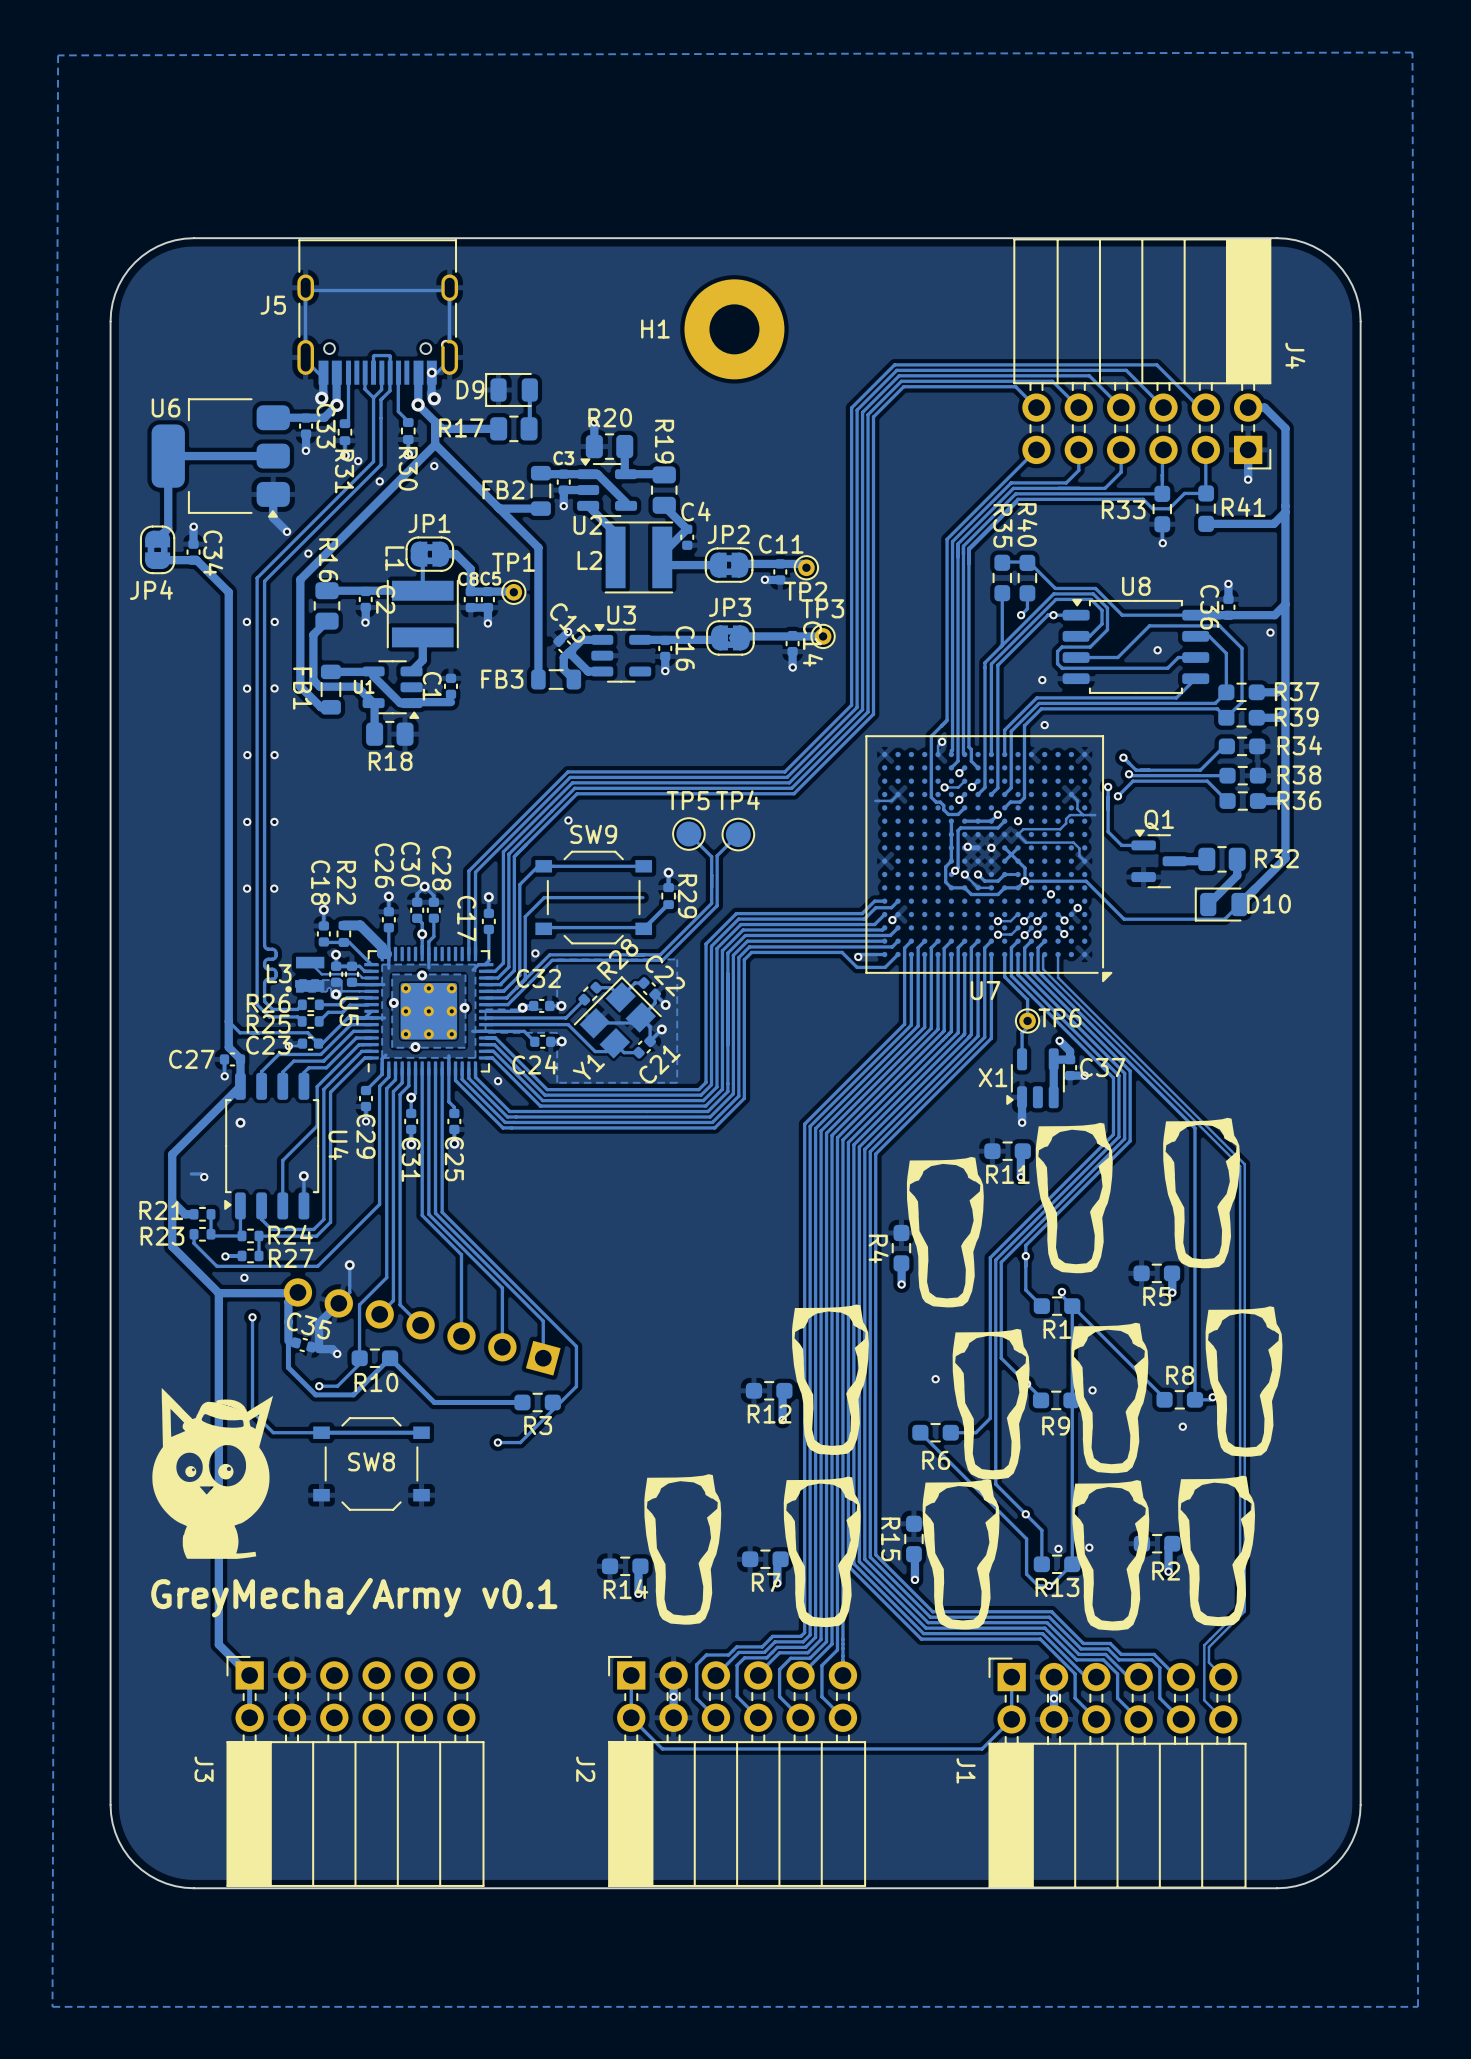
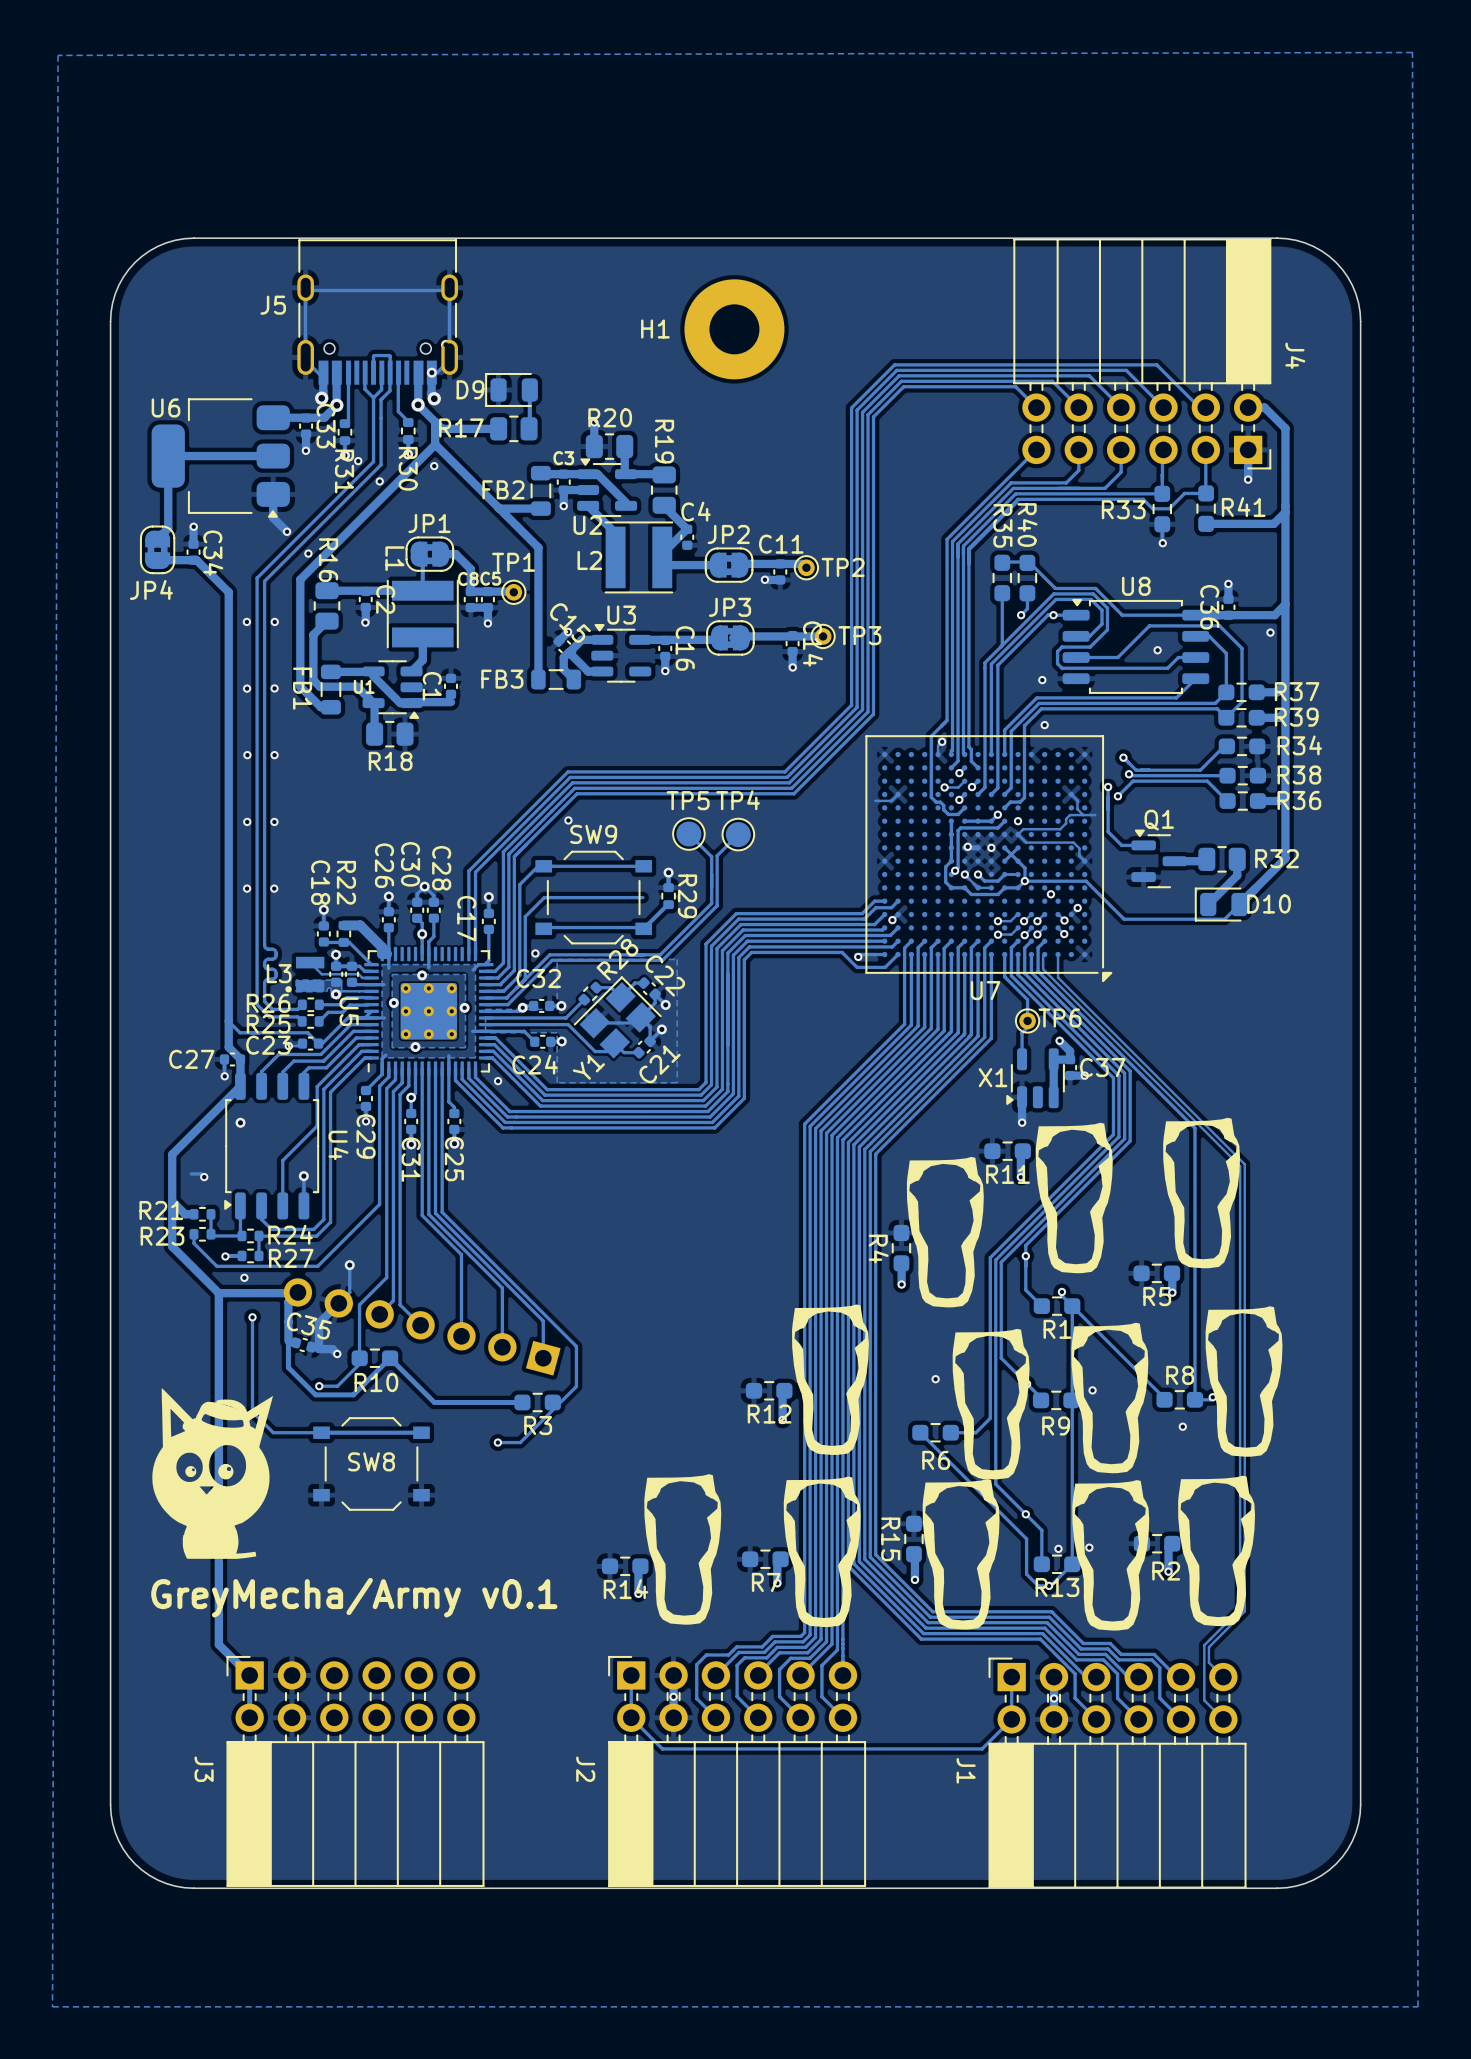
TP2 name position: TP2 (805, 591) -> TP2 (843, 567)
TP3 name position: TP3 (822, 608) -> TP3 (859, 635)

